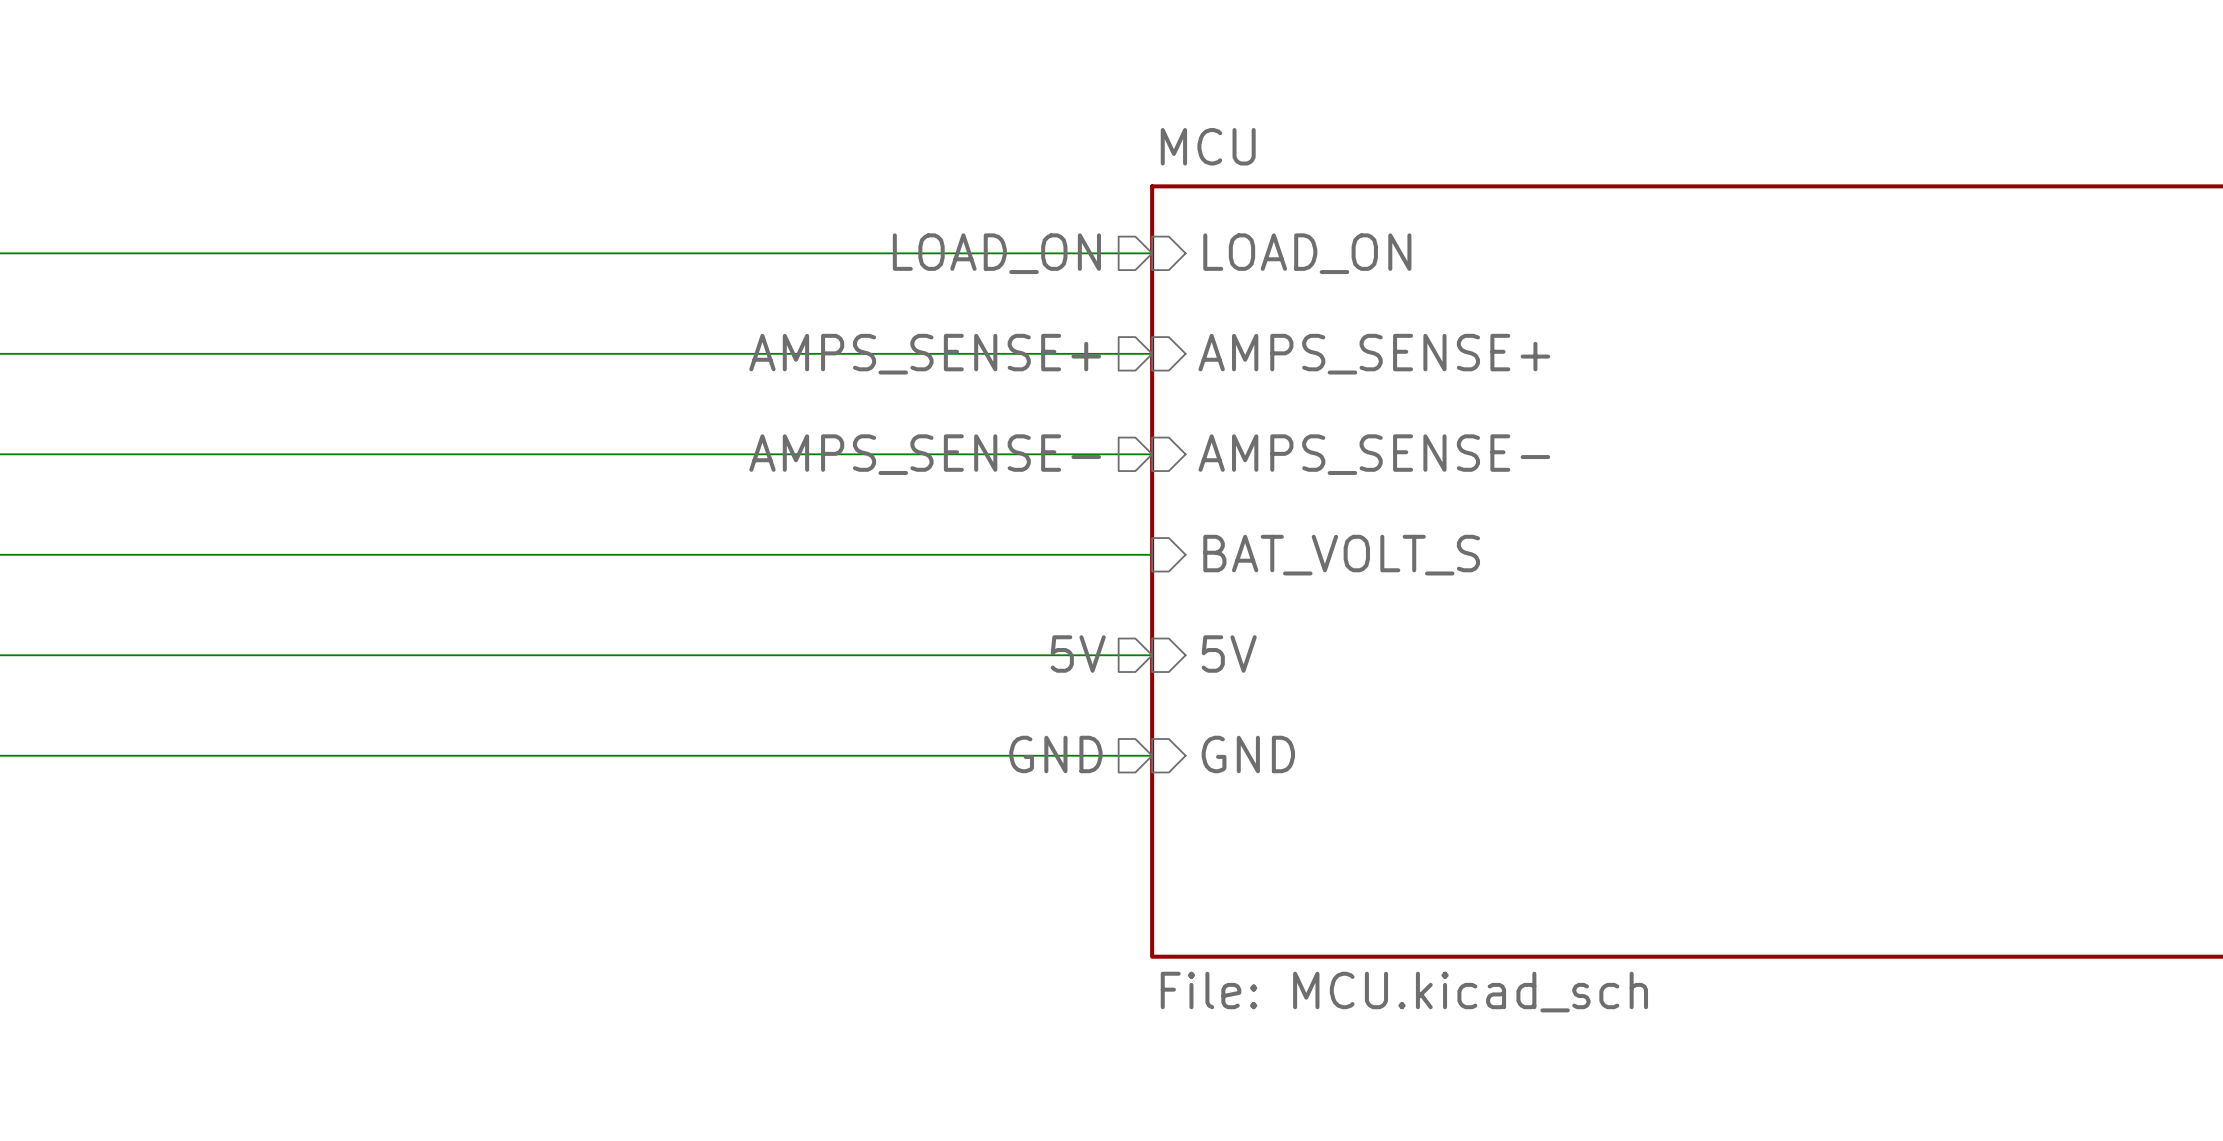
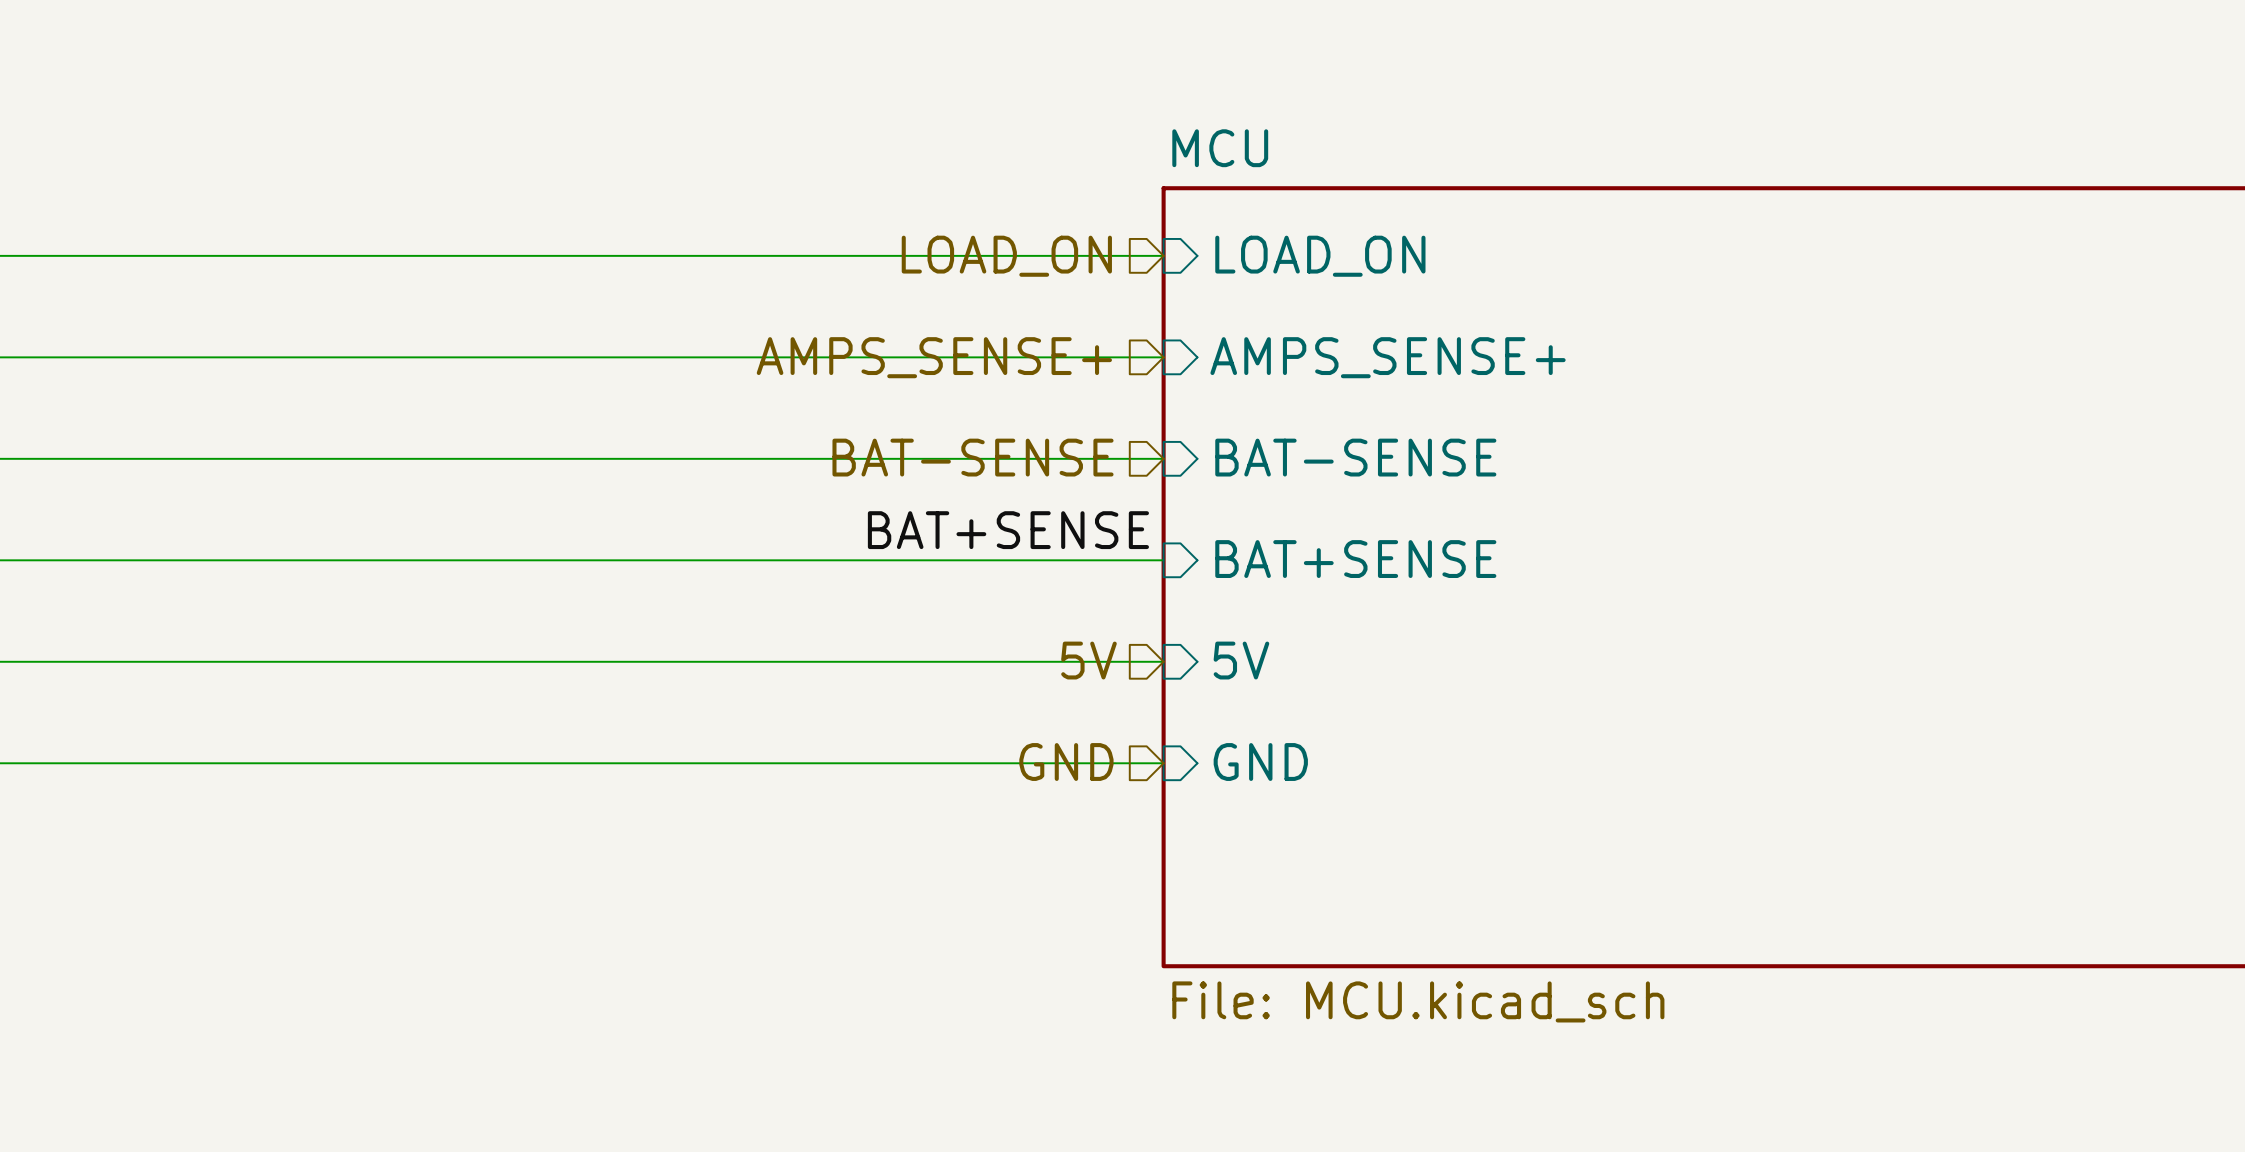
hierarchical label: AMPS_SENSE- (925, 454) -> BAT-SENSE (973, 457)
sheet pin: AMPS_SENSE- (1374, 454) -> BAT-SENSE (1355, 457)
label: none -> BAT+SENSE (1008, 530)
sheet pin: BAT_VOLT_S (1341, 555) -> BAT+SENSE (1355, 559)

